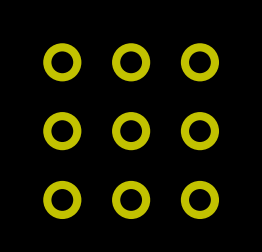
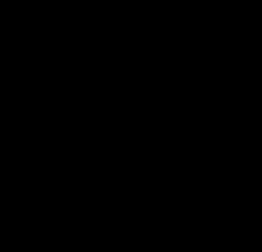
part: (62, 62) -> none
part: (131, 62) -> none
part: (199, 62) -> none
part: (62, 131) -> none
part: (131, 131) -> none
part: (199, 131) -> none
part: (62, 199) -> none
part: (131, 199) -> none
part: (199, 199) -> none

